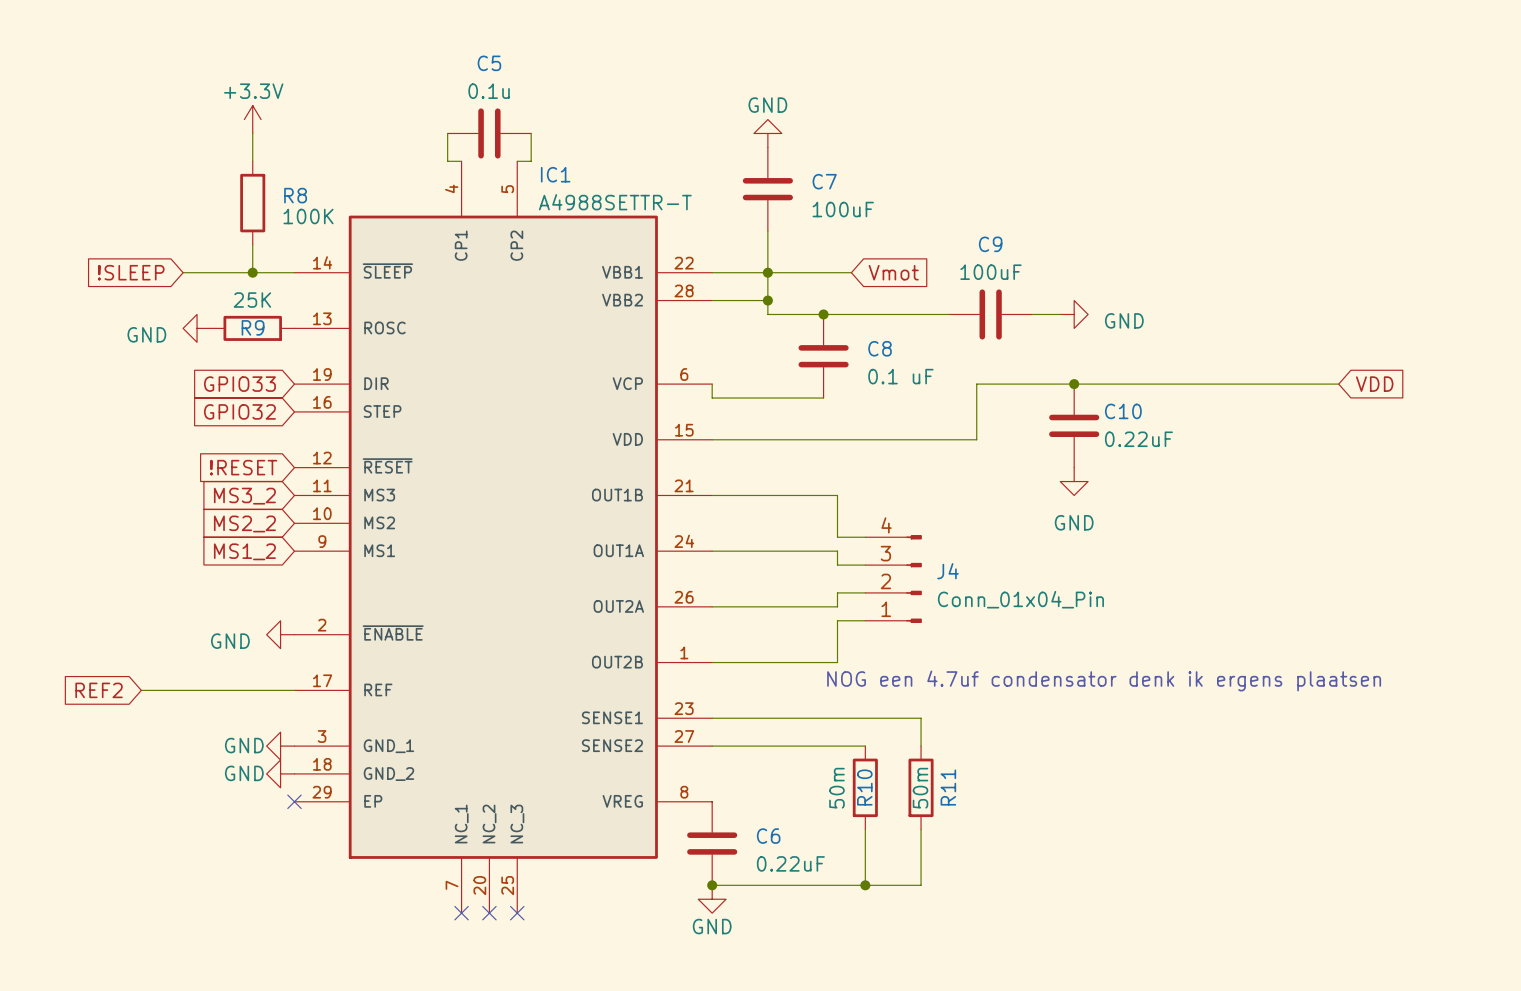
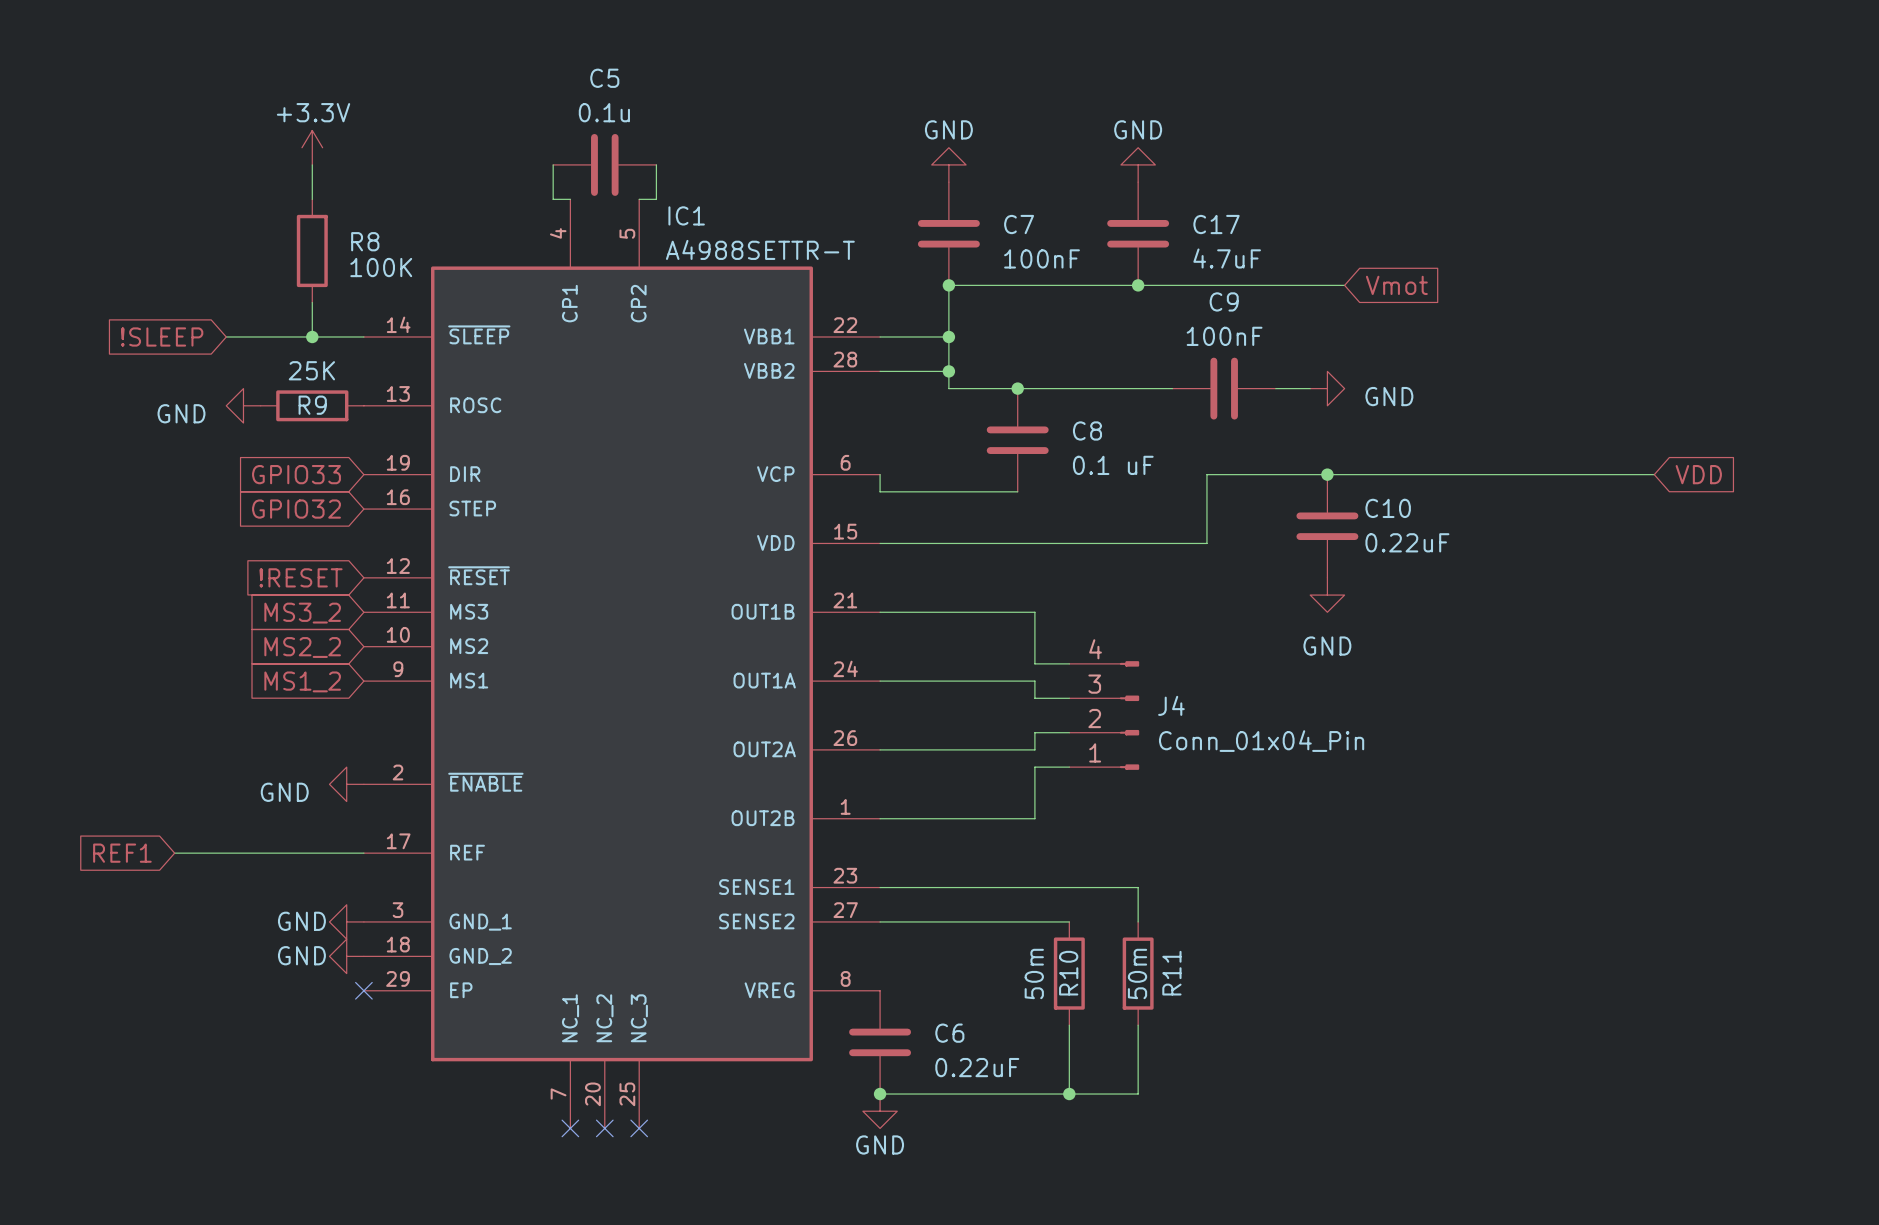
power symbol: none -> GND (1138, 164)
C17: none -> 4.7uF (1138, 233)
C7 value: 100uF (843, 209) -> 100nF (1042, 258)
wire: none -> (948, 285) (1344, 285)
junction: none -> (948, 285)
junction: none -> (1138, 285)
wire: (767, 272) (851, 272) -> none
global label position: Vmot (893, 272) -> Vmot (1396, 285)
C9 value: 100uF (990, 272) -> 100nF (1224, 336)
text: NOG een 4.7uf condensator denk ik ergens plaatsen (1104, 680) -> none
global label: REF2 (99, 690) -> REF1 (122, 853)

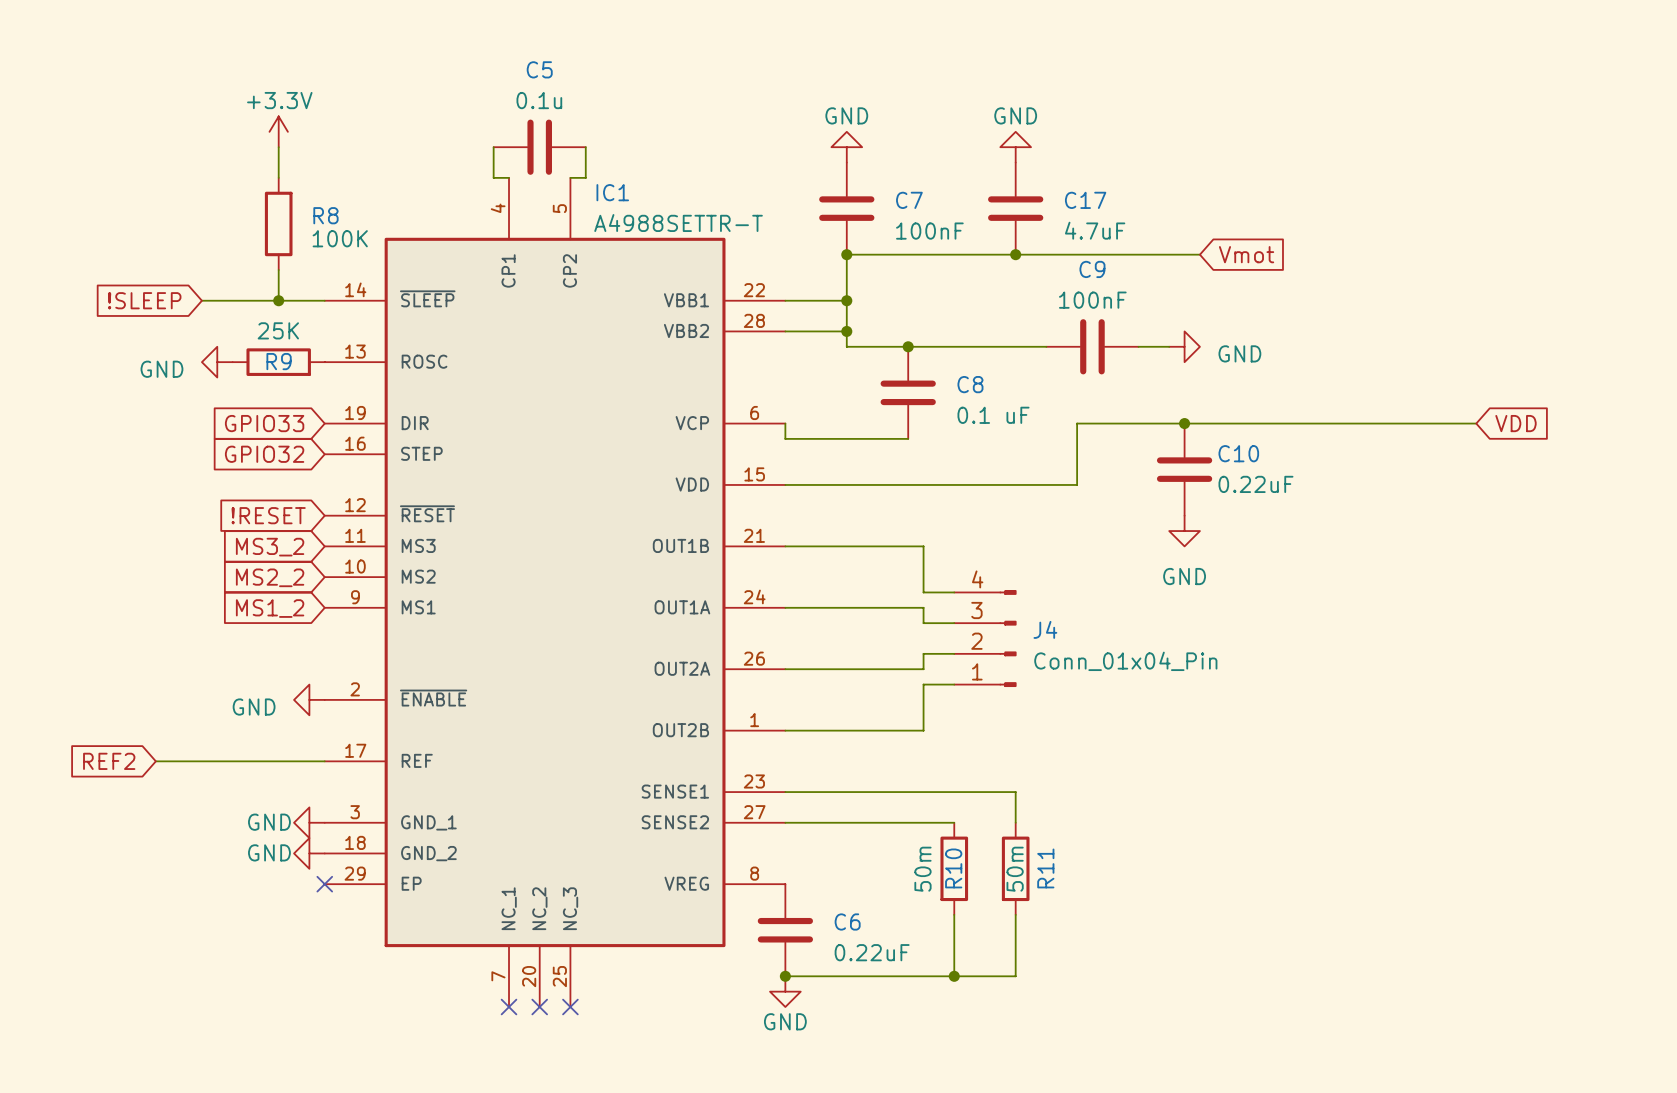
global label: REF1 (122, 853) -> REF2 (109, 761)

